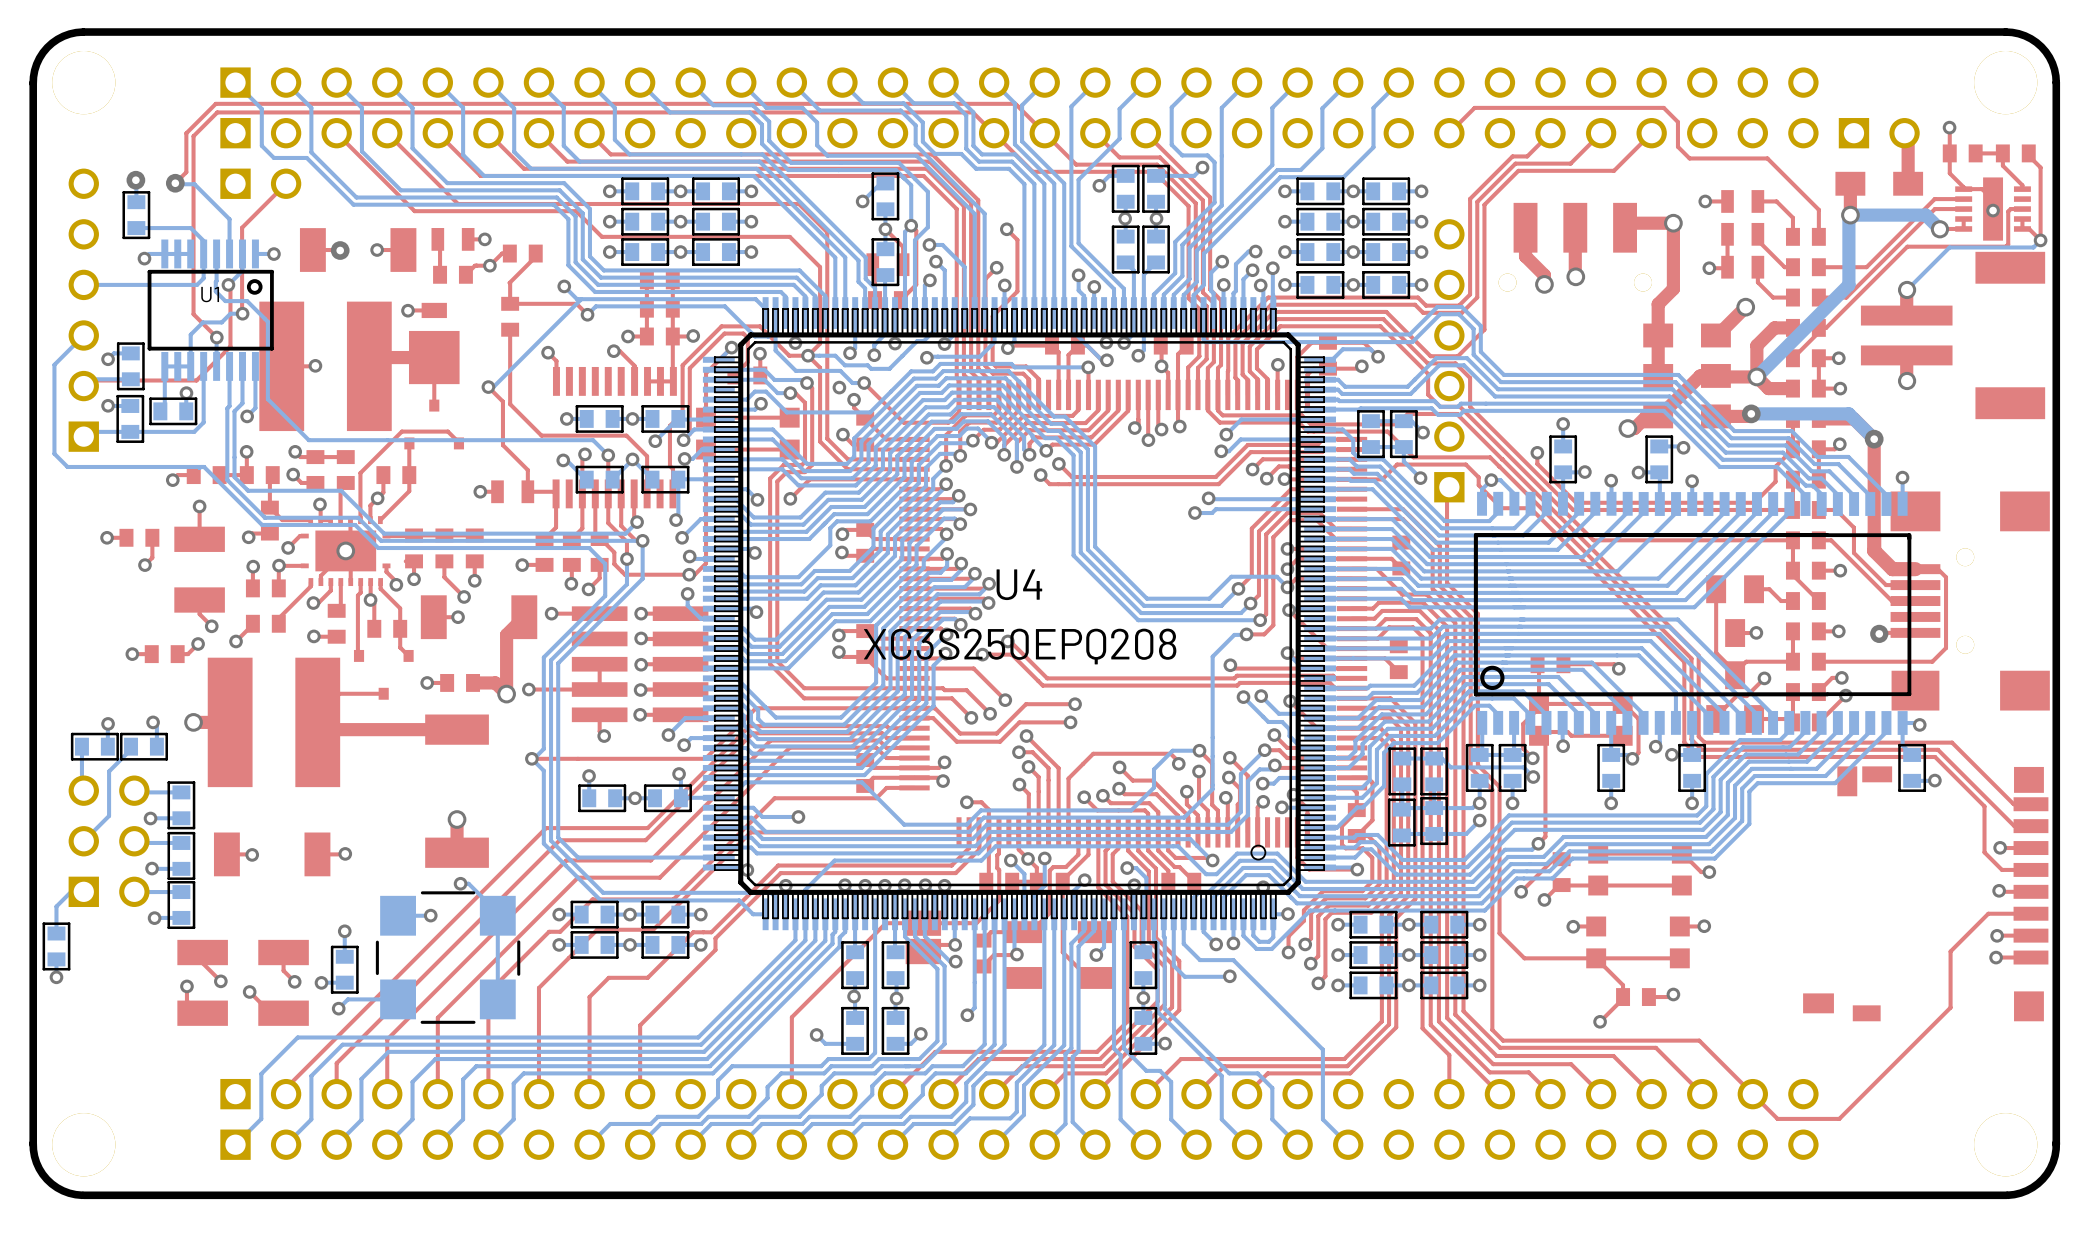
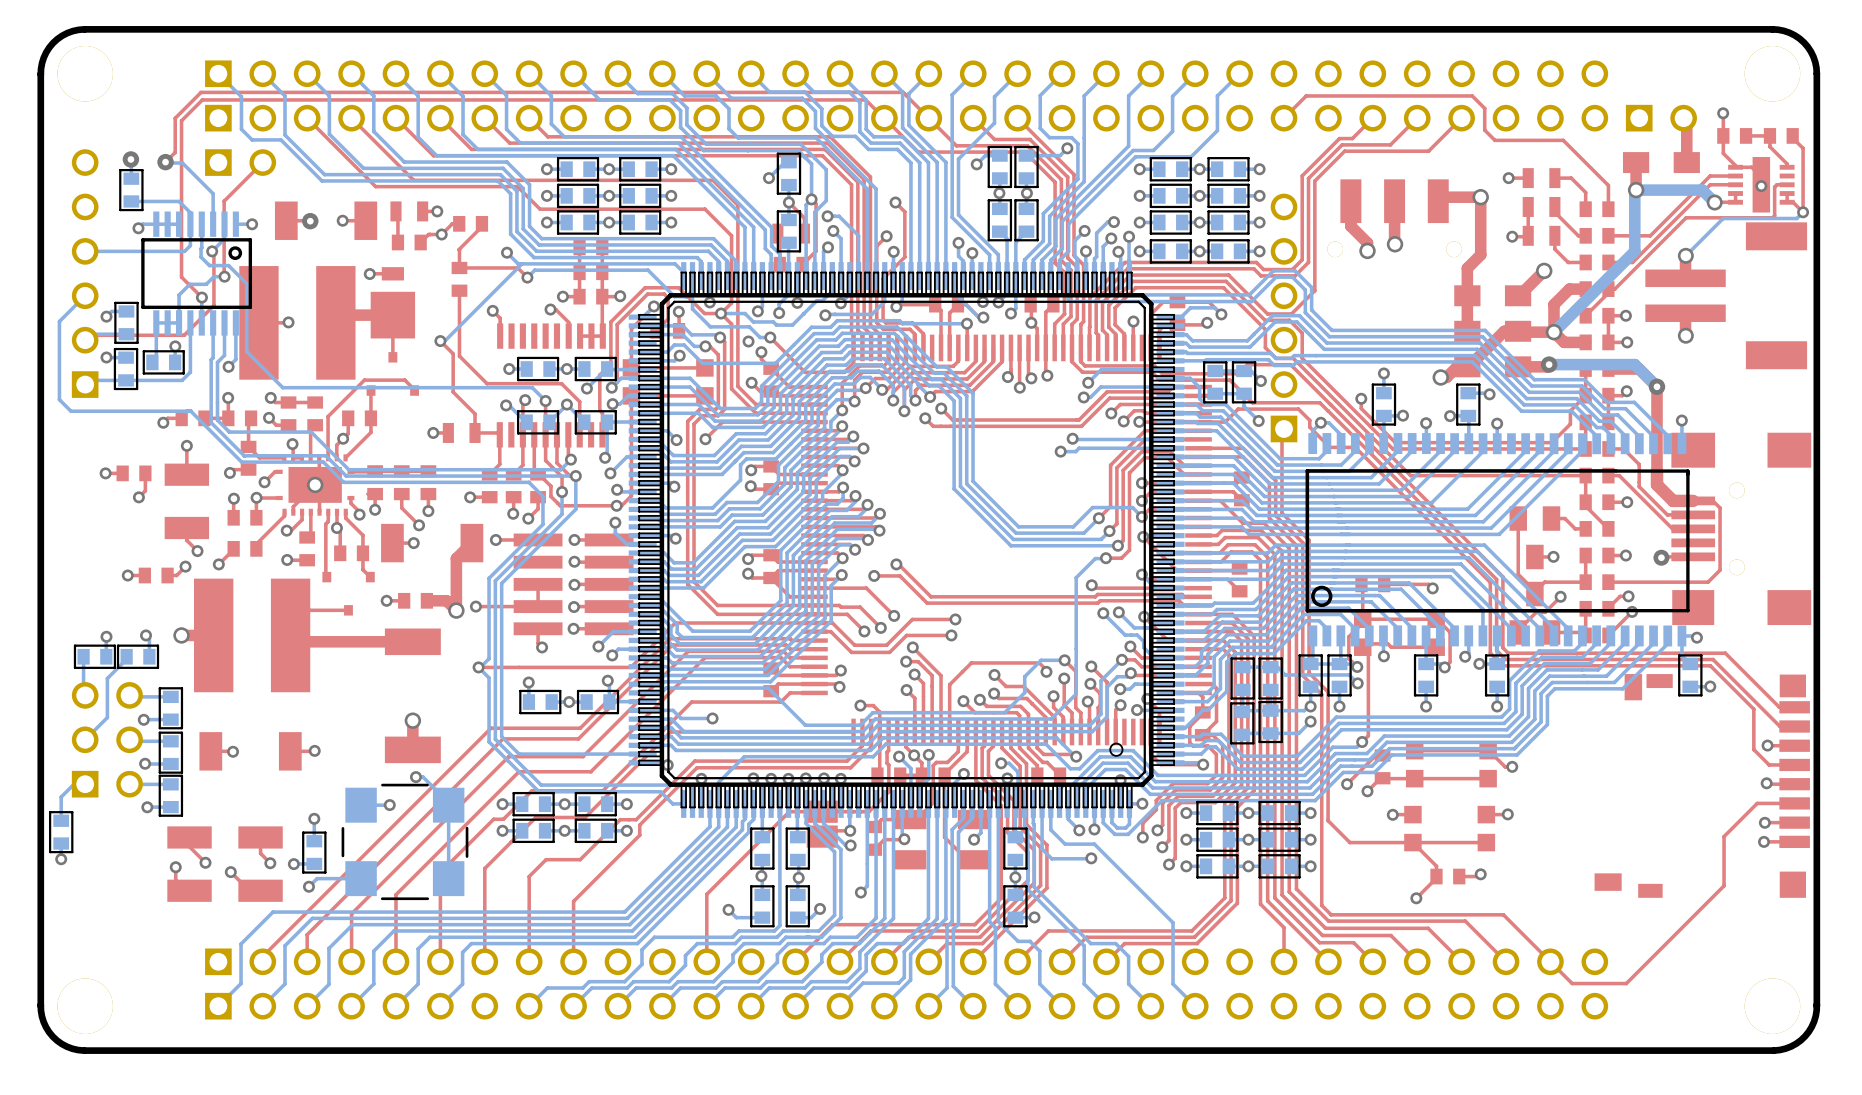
U1 name: U1 (210, 294) -> none
U4 name: U4 (1019, 584) -> none
U4 value: XC3S250EPQ208 (1020, 646) -> none

